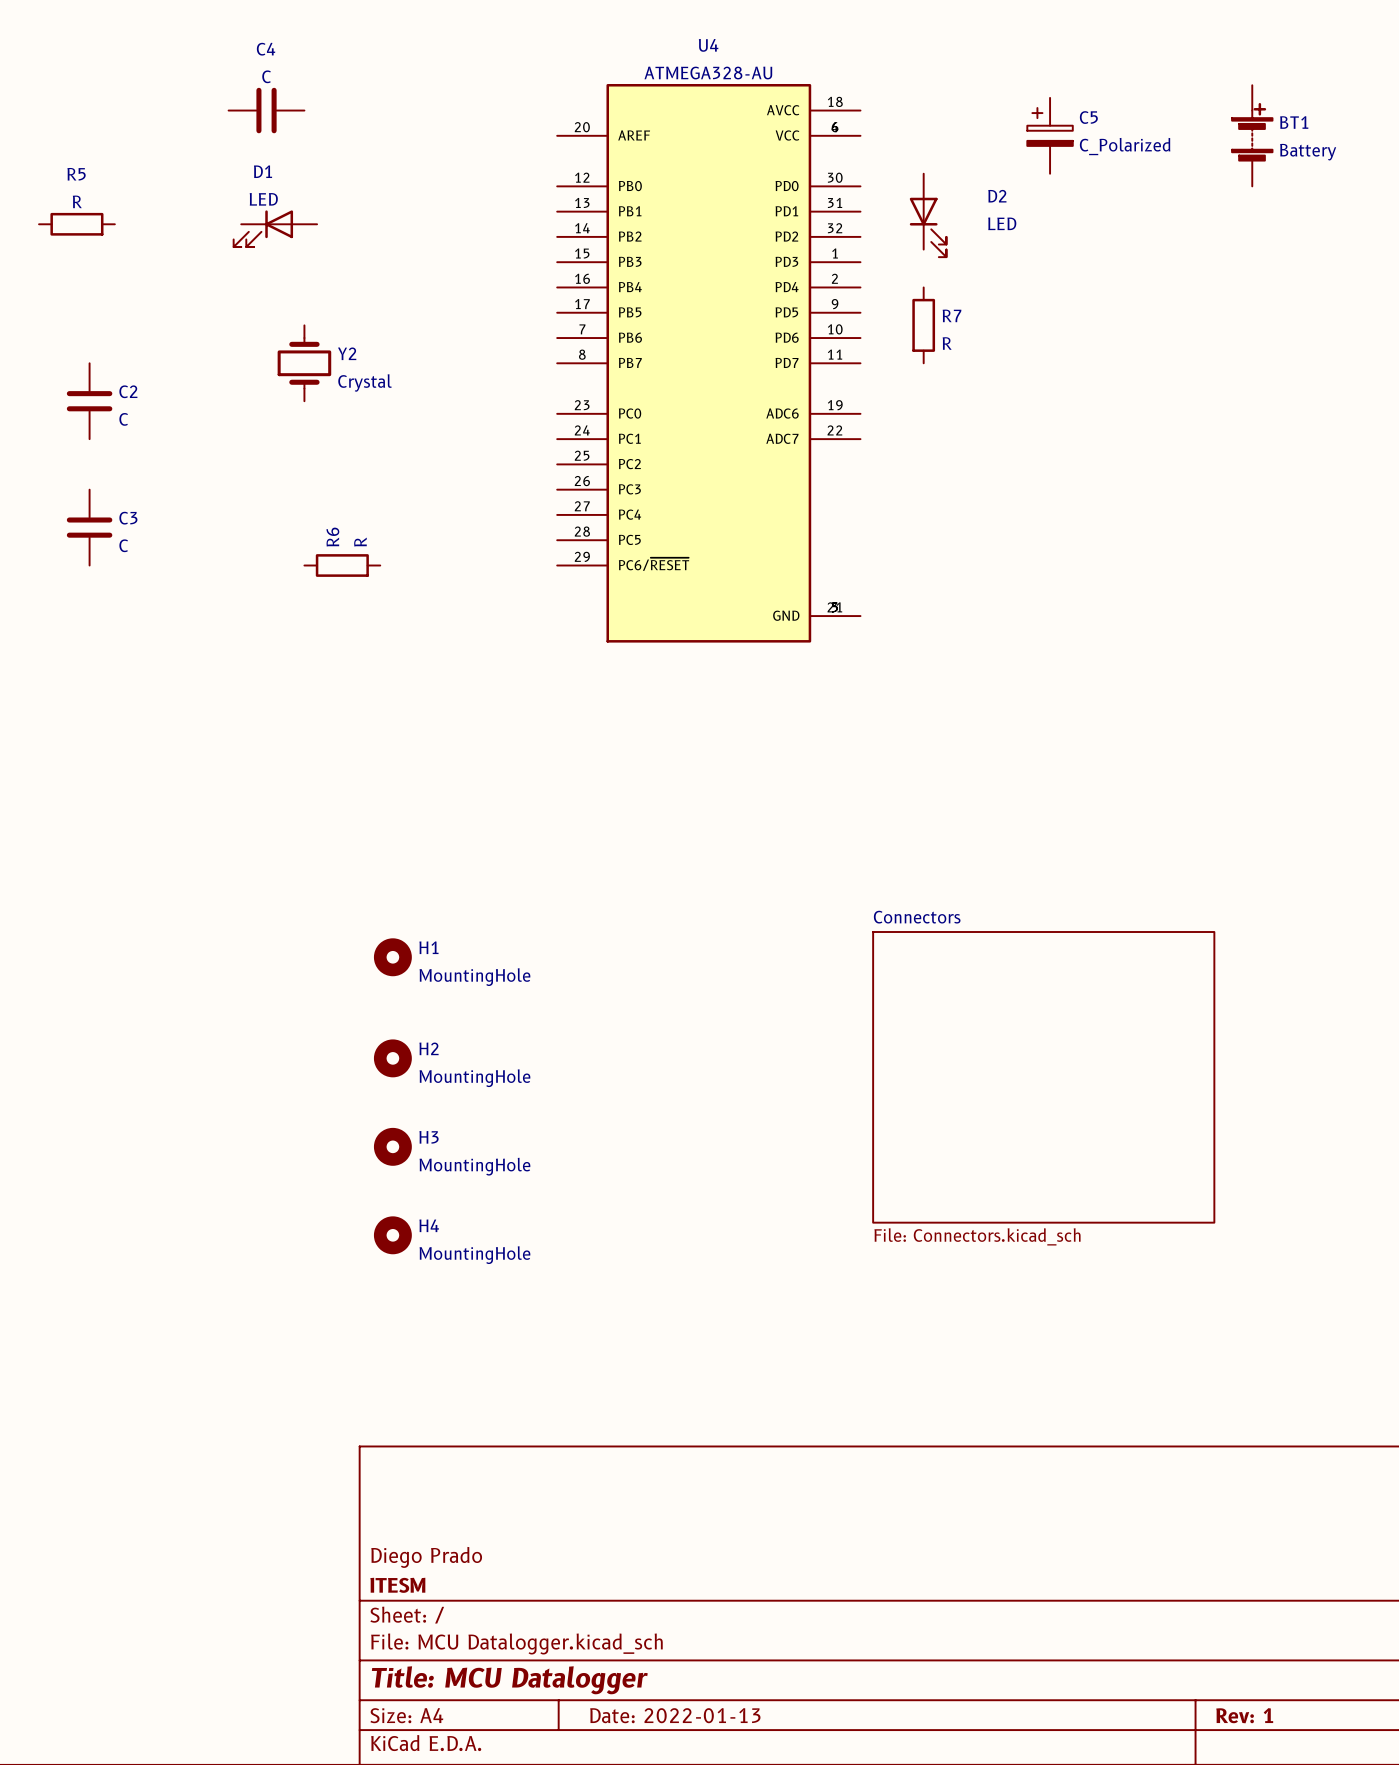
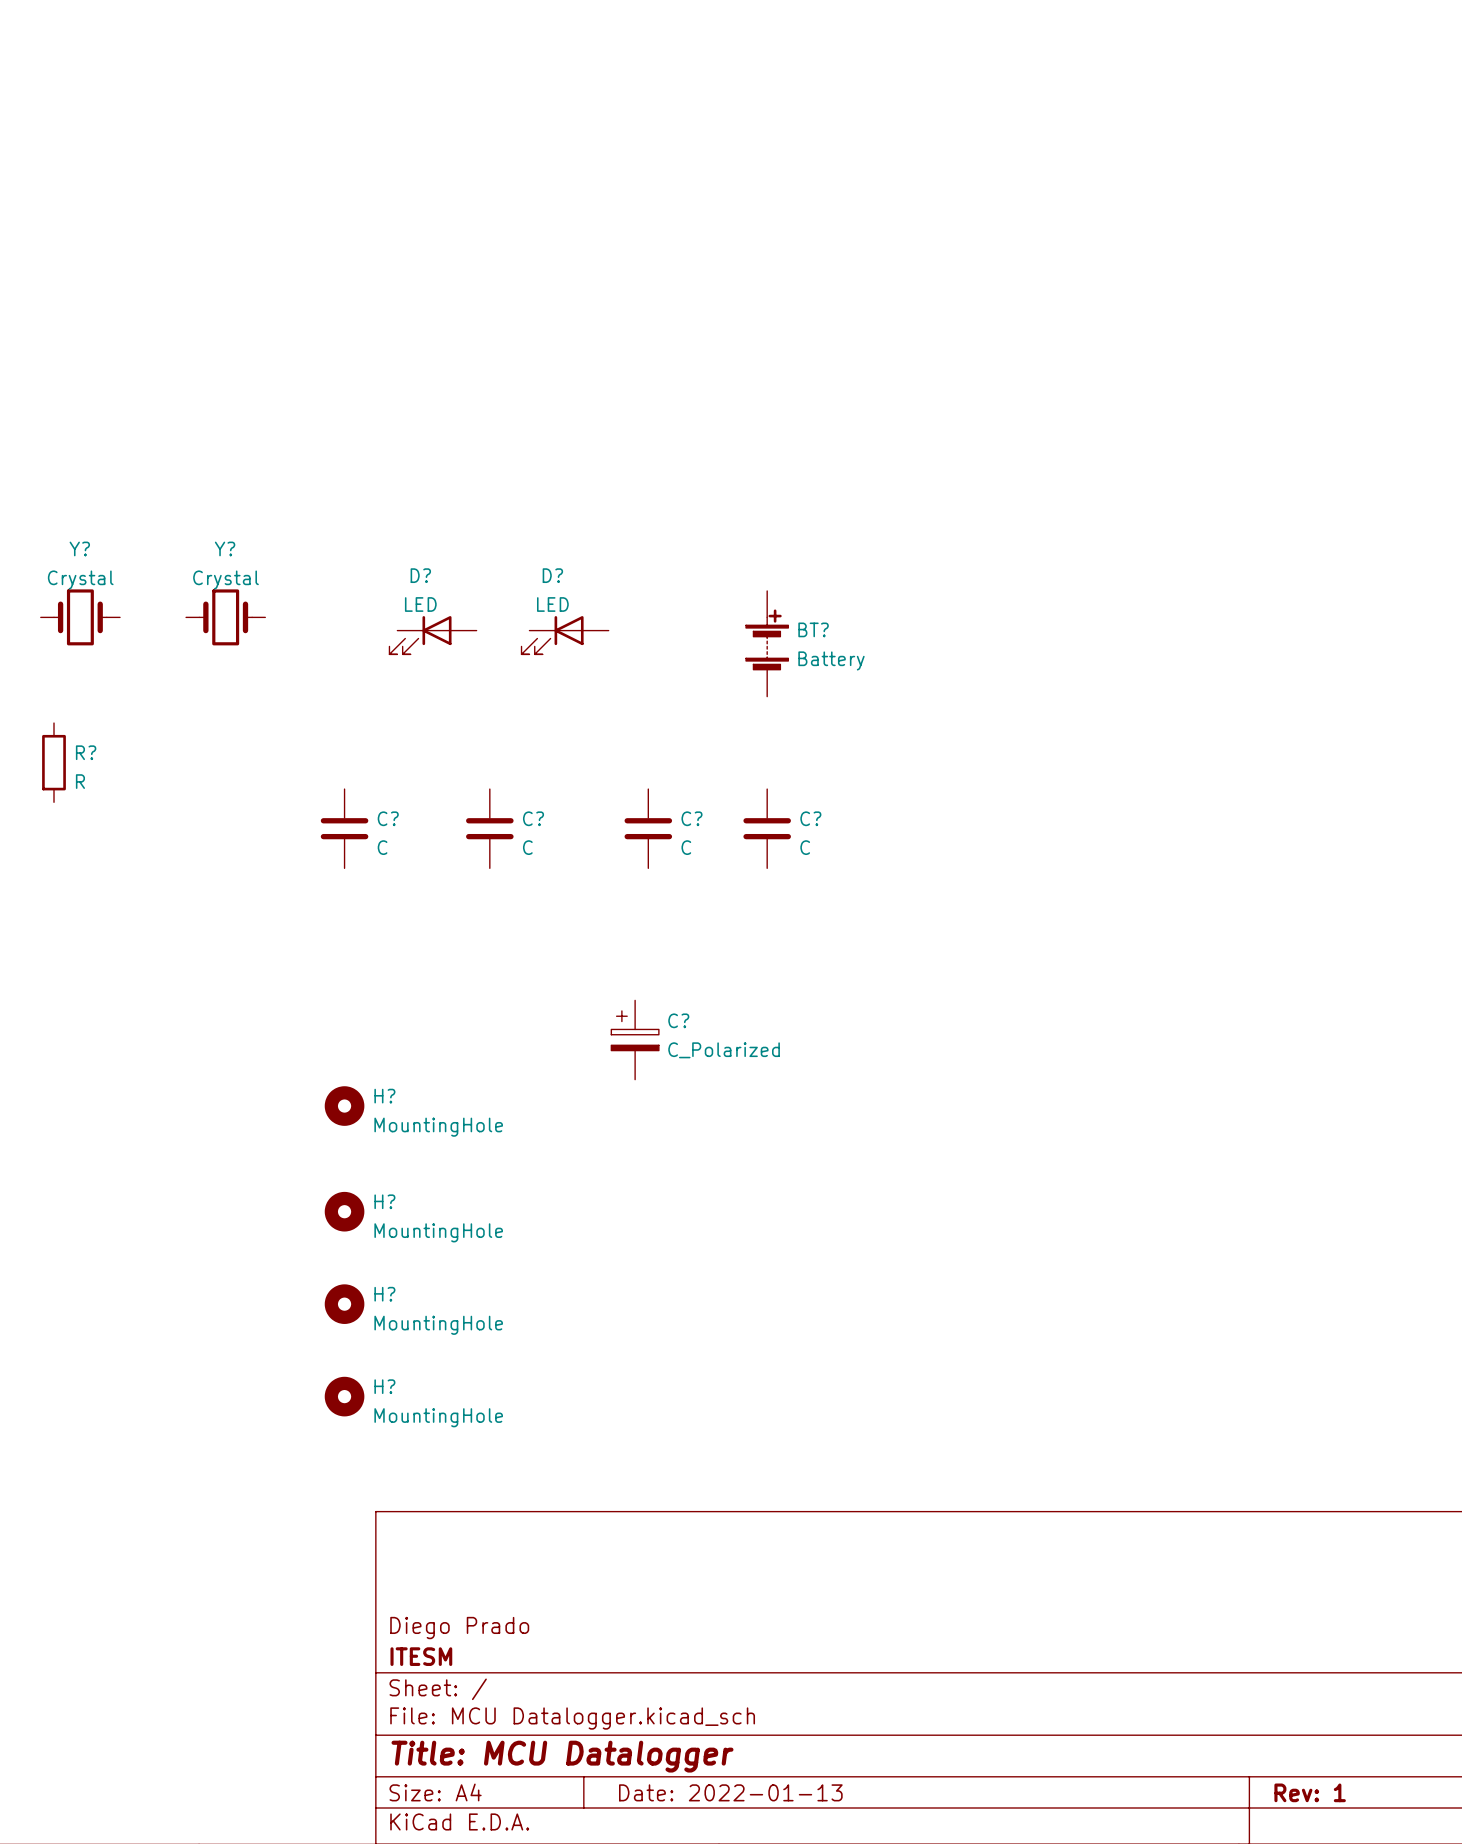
C4: C (266, 110) -> none
C5: C_Polarized (1050, 135) -> none
BT1: Battery (1252, 135) -> none
D2: LED (928, 215) -> none
R5: R (76, 224) -> none
D1: LED (275, 228) -> none
R7: R (923, 325) -> none
Y2: Crystal (304, 363) -> none
U4: ATMEGA328-AU (708, 363) -> none
C2: C (89, 401) -> none
C3: C (89, 527) -> none
R6: R (342, 565) -> none
Y?: none -> Crystal (80, 617)
Y?: none -> Crystal (225, 617)
D?: none -> LED (433, 635)
D?: none -> LED (565, 635)
BT?: none -> Battery (767, 643)
R?: none -> R (53, 762)
C?: none -> C (344, 828)
C?: none -> C (489, 828)
C?: none -> C (648, 828)
C?: none -> C (767, 828)
H1: MountingHole (392, 957) -> none
C?: none -> C_Polarized (635, 1040)
H?: none -> MountingHole (344, 1106)
H2: MountingHole (392, 1058) -> none
sheet Connectors: File: Connectors.kicad_sch (1043, 1077) -> none
H3: MountingHole (392, 1146) -> none
H?: none -> MountingHole (344, 1211)
H4: MountingHole (392, 1235) -> none
H?: none -> MountingHole (344, 1304)
H?: none -> MountingHole (344, 1396)

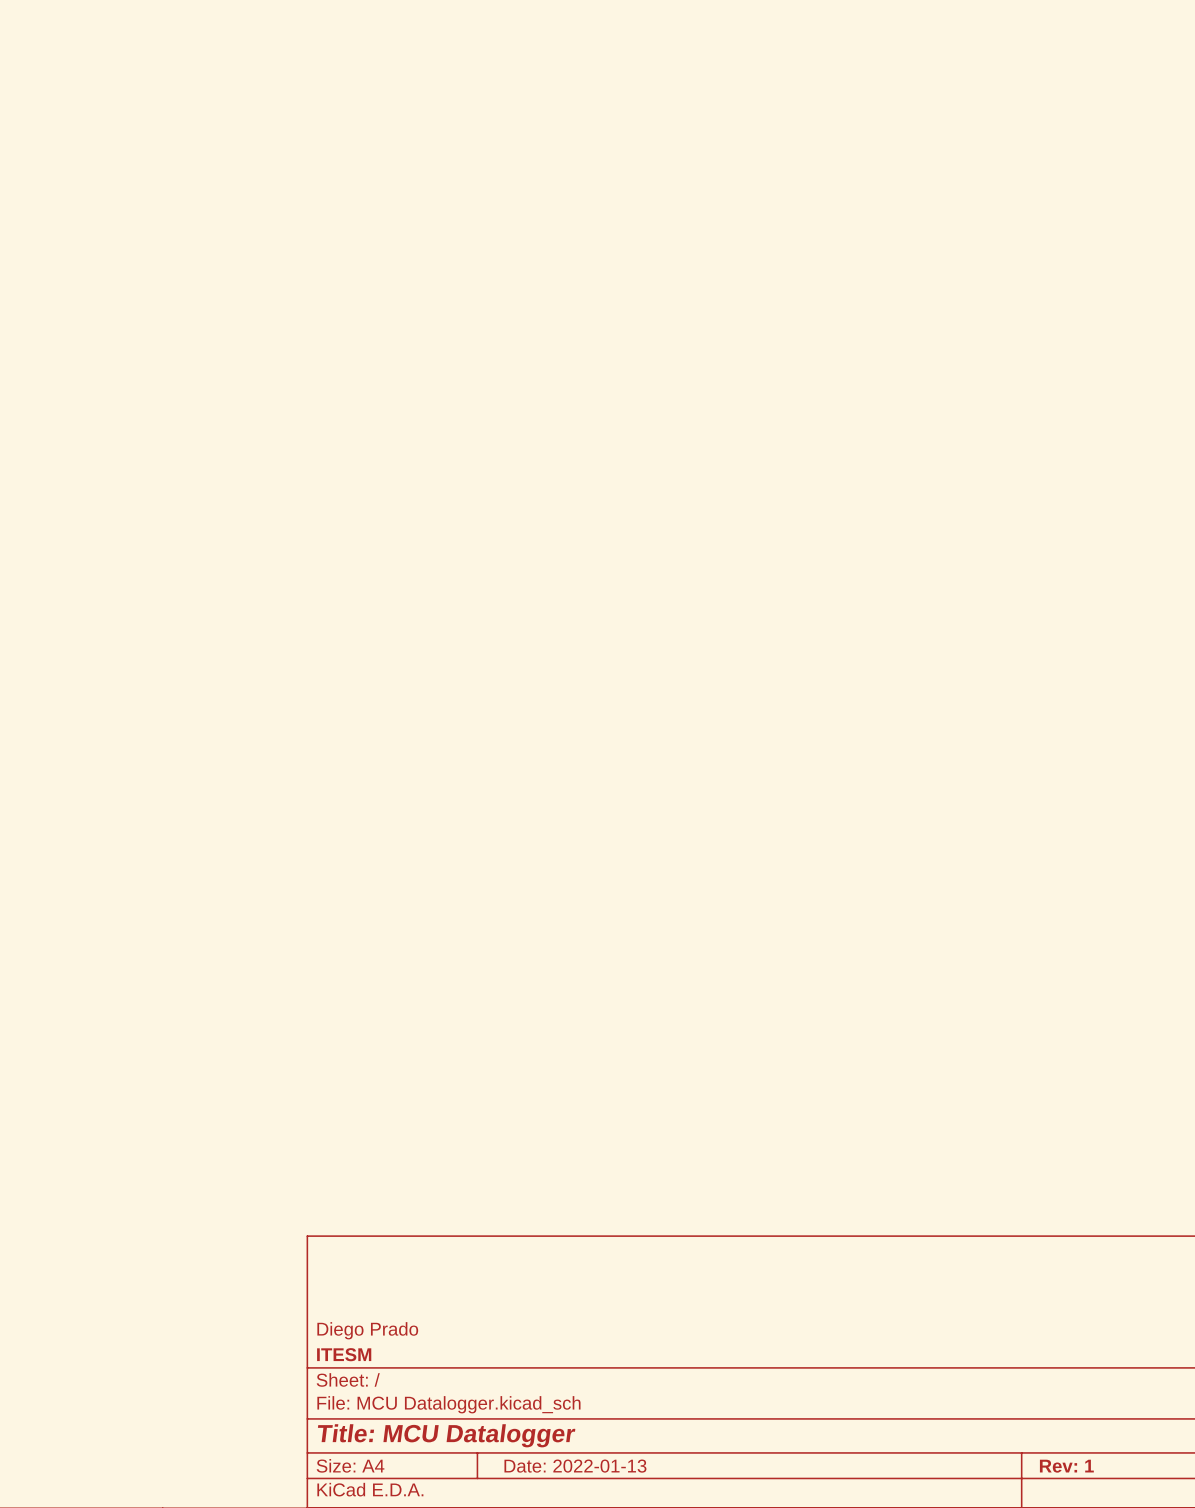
Y?: Crystal (80, 617) -> none
Y?: Crystal (225, 617) -> none
D?: LED (433, 635) -> none
D?: LED (565, 635) -> none
BT?: Battery (767, 643) -> none
R?: R (53, 762) -> none
C?: C (344, 828) -> none
C?: C (489, 828) -> none
C?: C (648, 828) -> none
C?: C (767, 828) -> none
C?: C_Polarized (635, 1040) -> none
H?: MountingHole (344, 1106) -> none
H?: MountingHole (344, 1211) -> none
H?: MountingHole (344, 1304) -> none
H?: MountingHole (344, 1396) -> none

